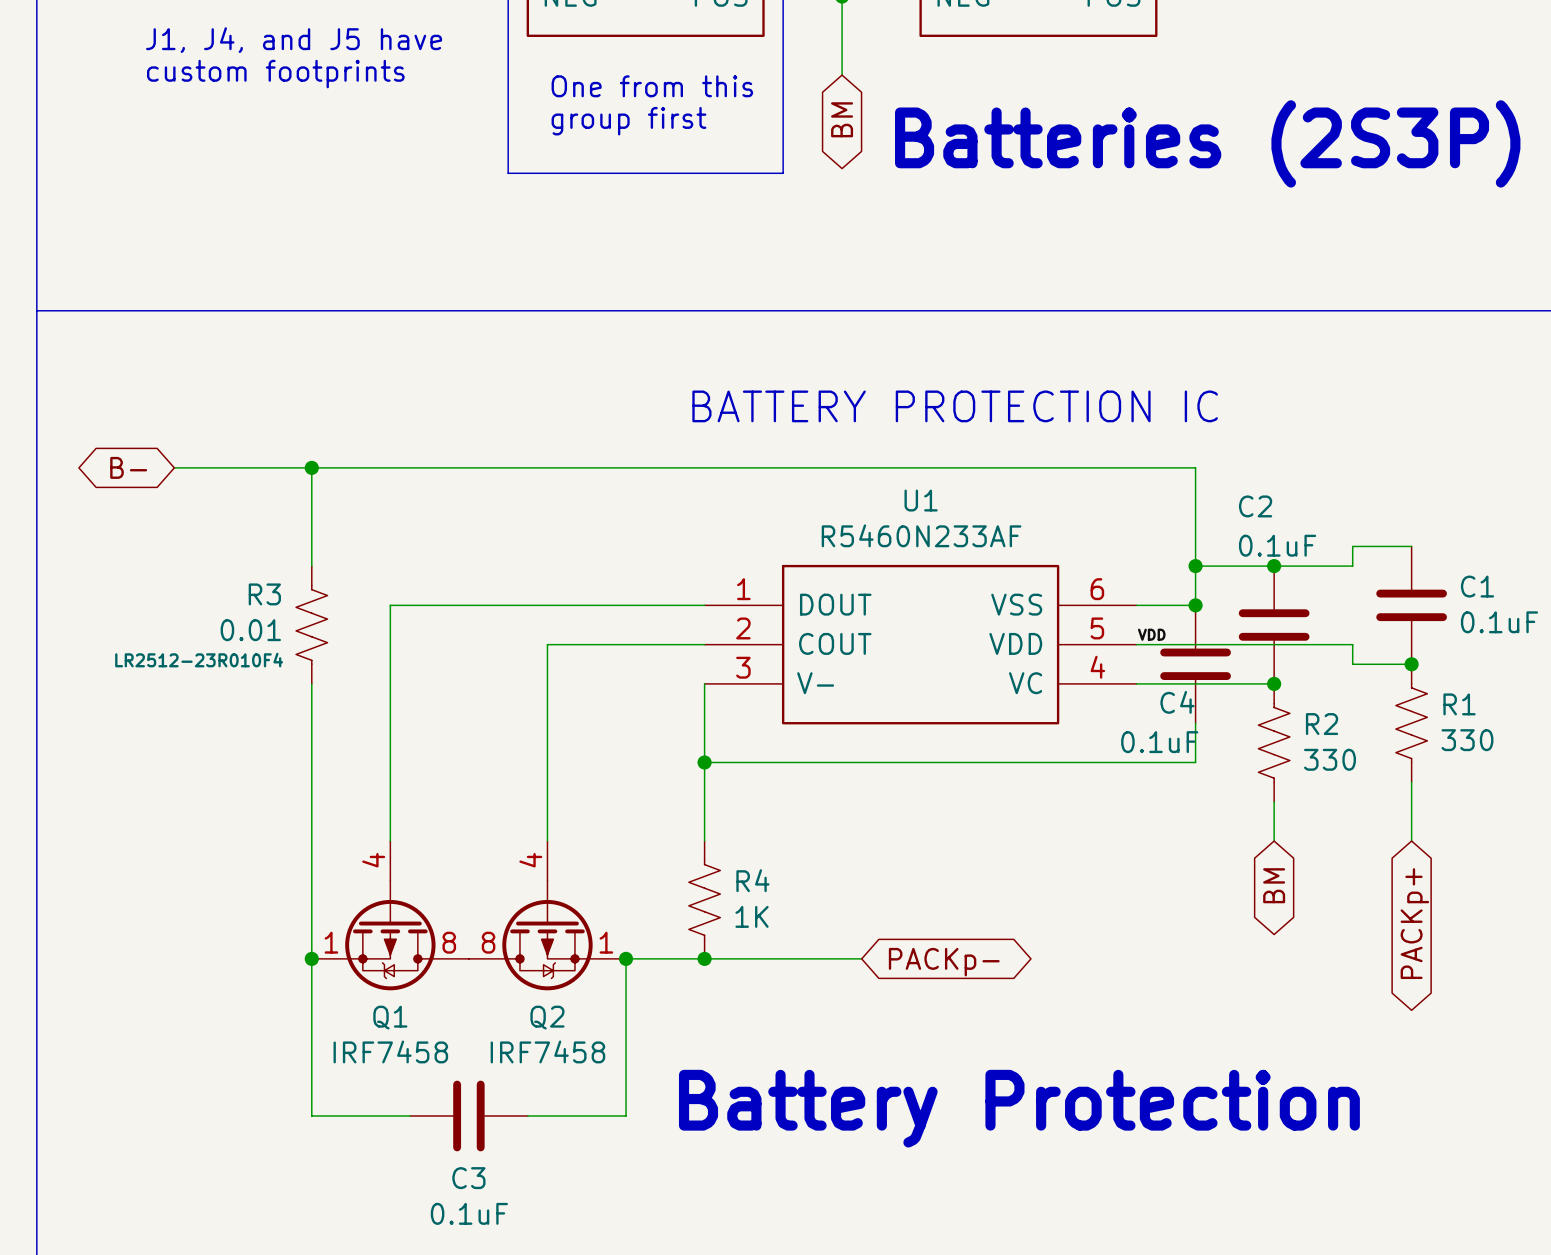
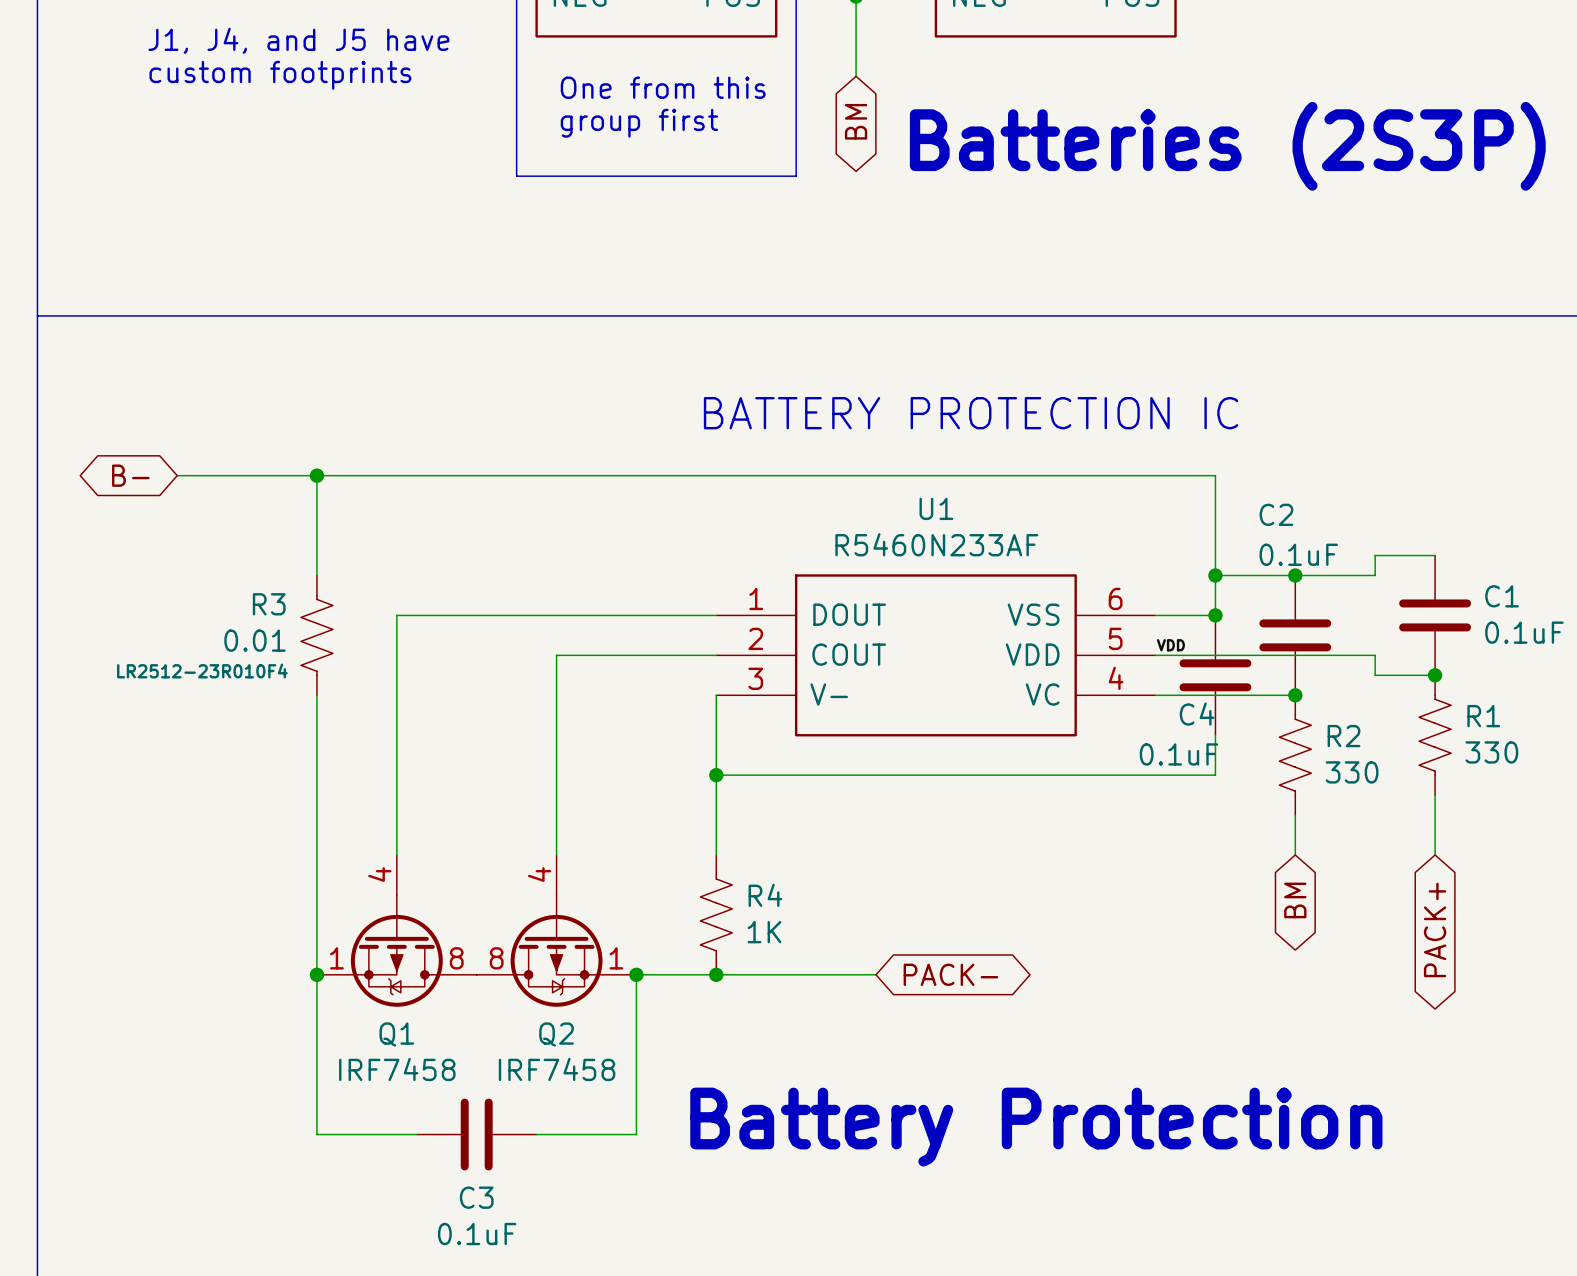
global label: PACKp+ (1414, 923) -> PACK+ (1435, 929)
global label: PACKp- (944, 962) -> PACK- (950, 974)

